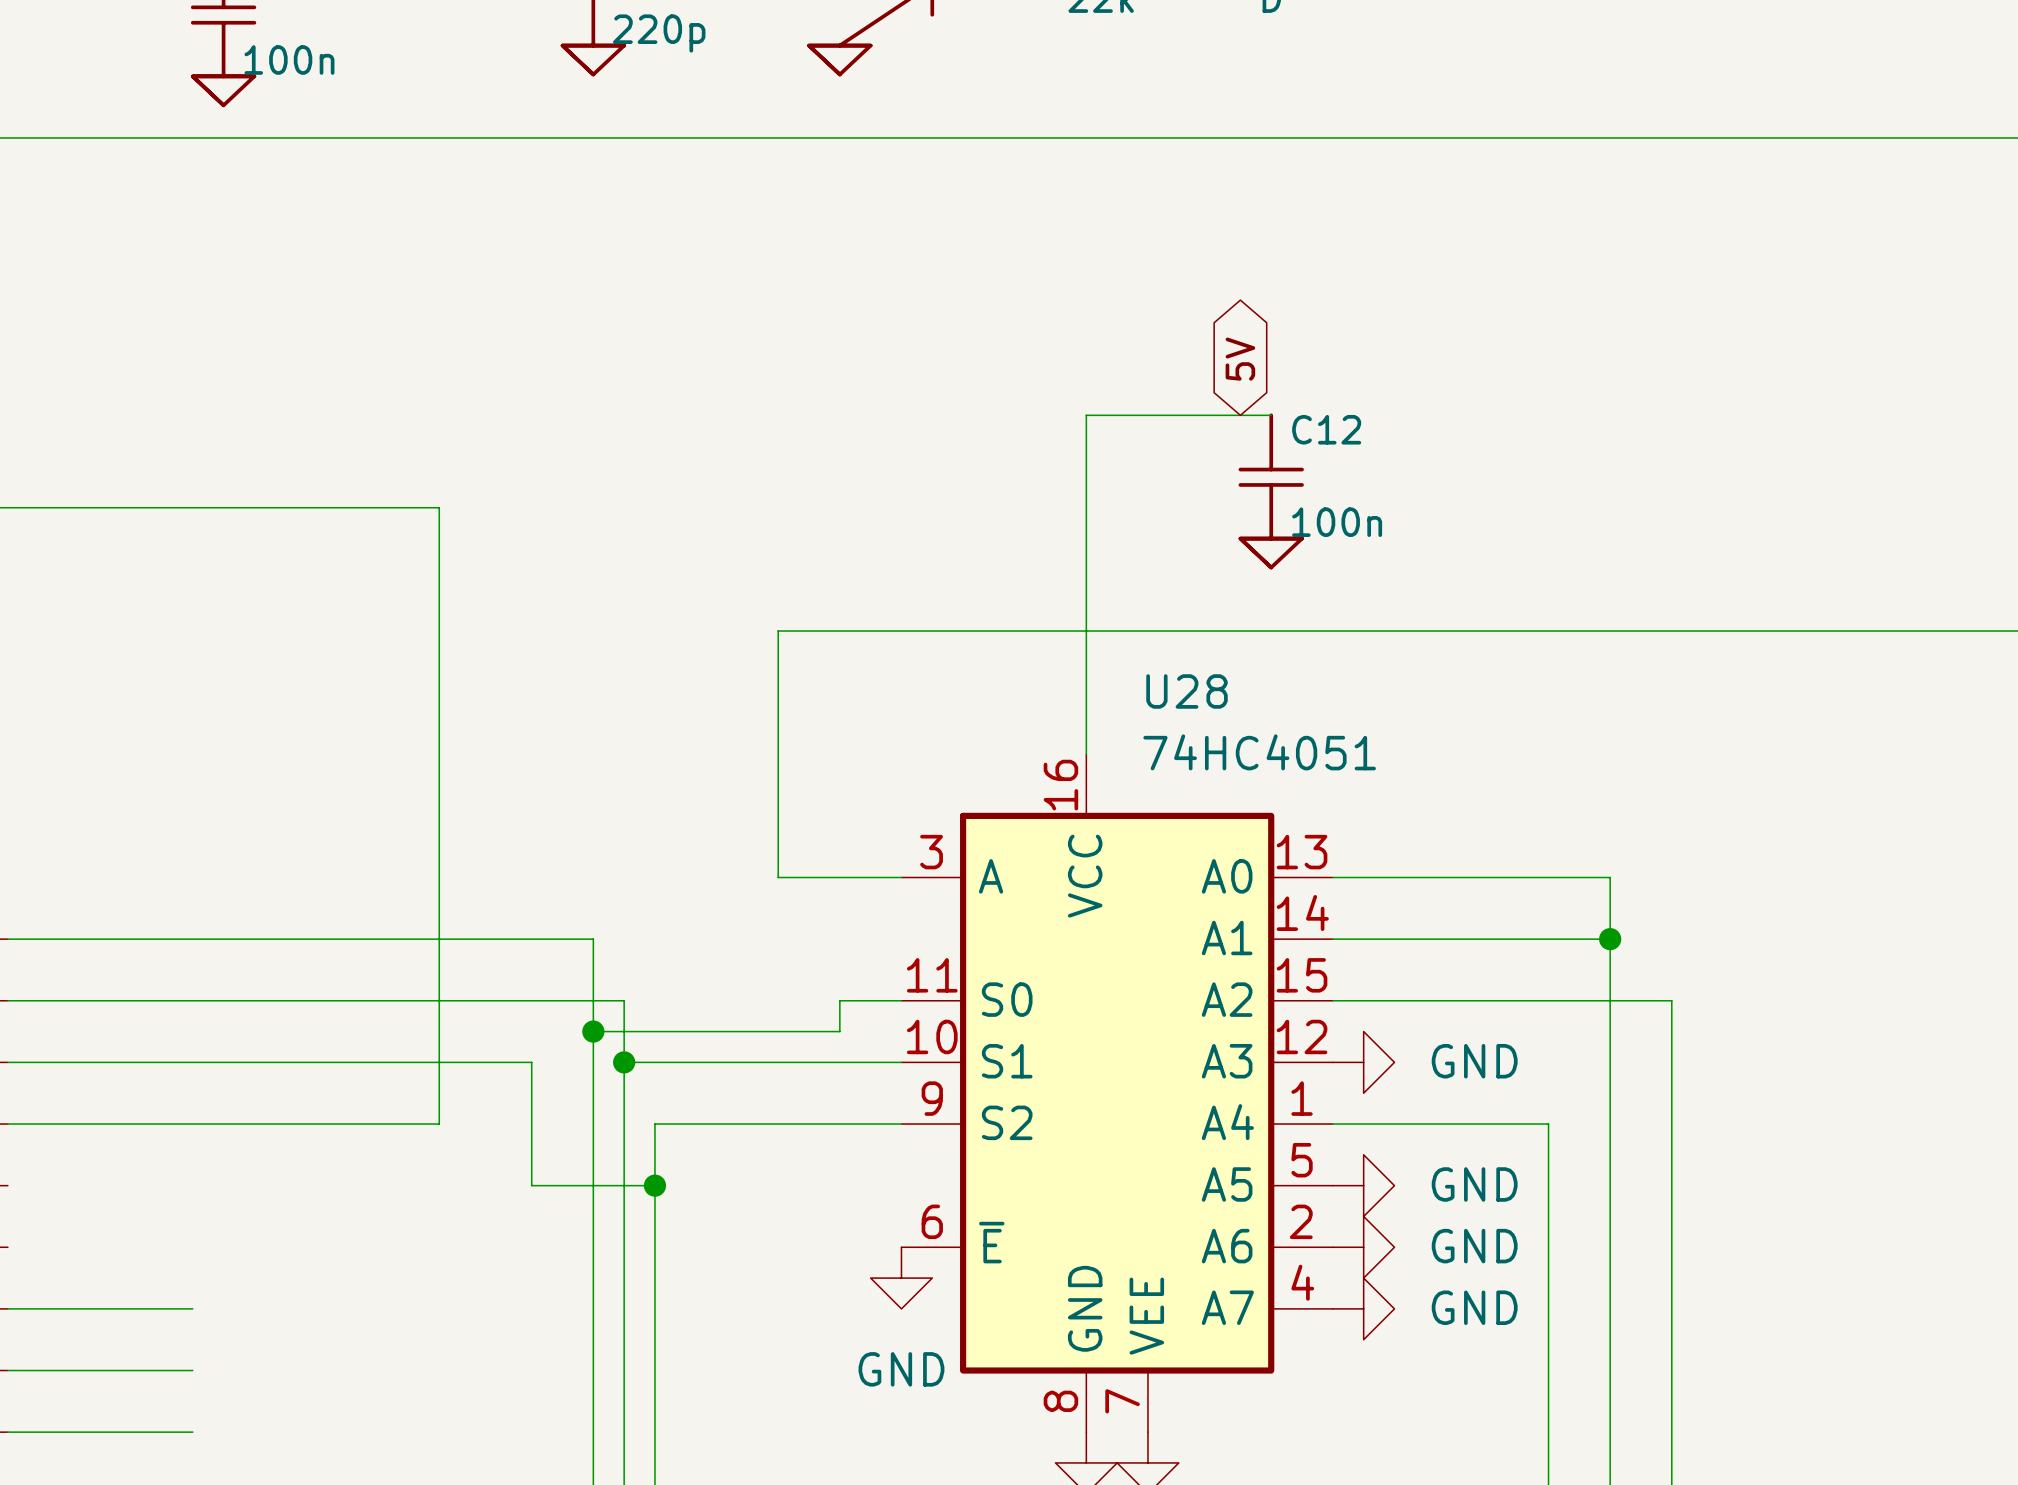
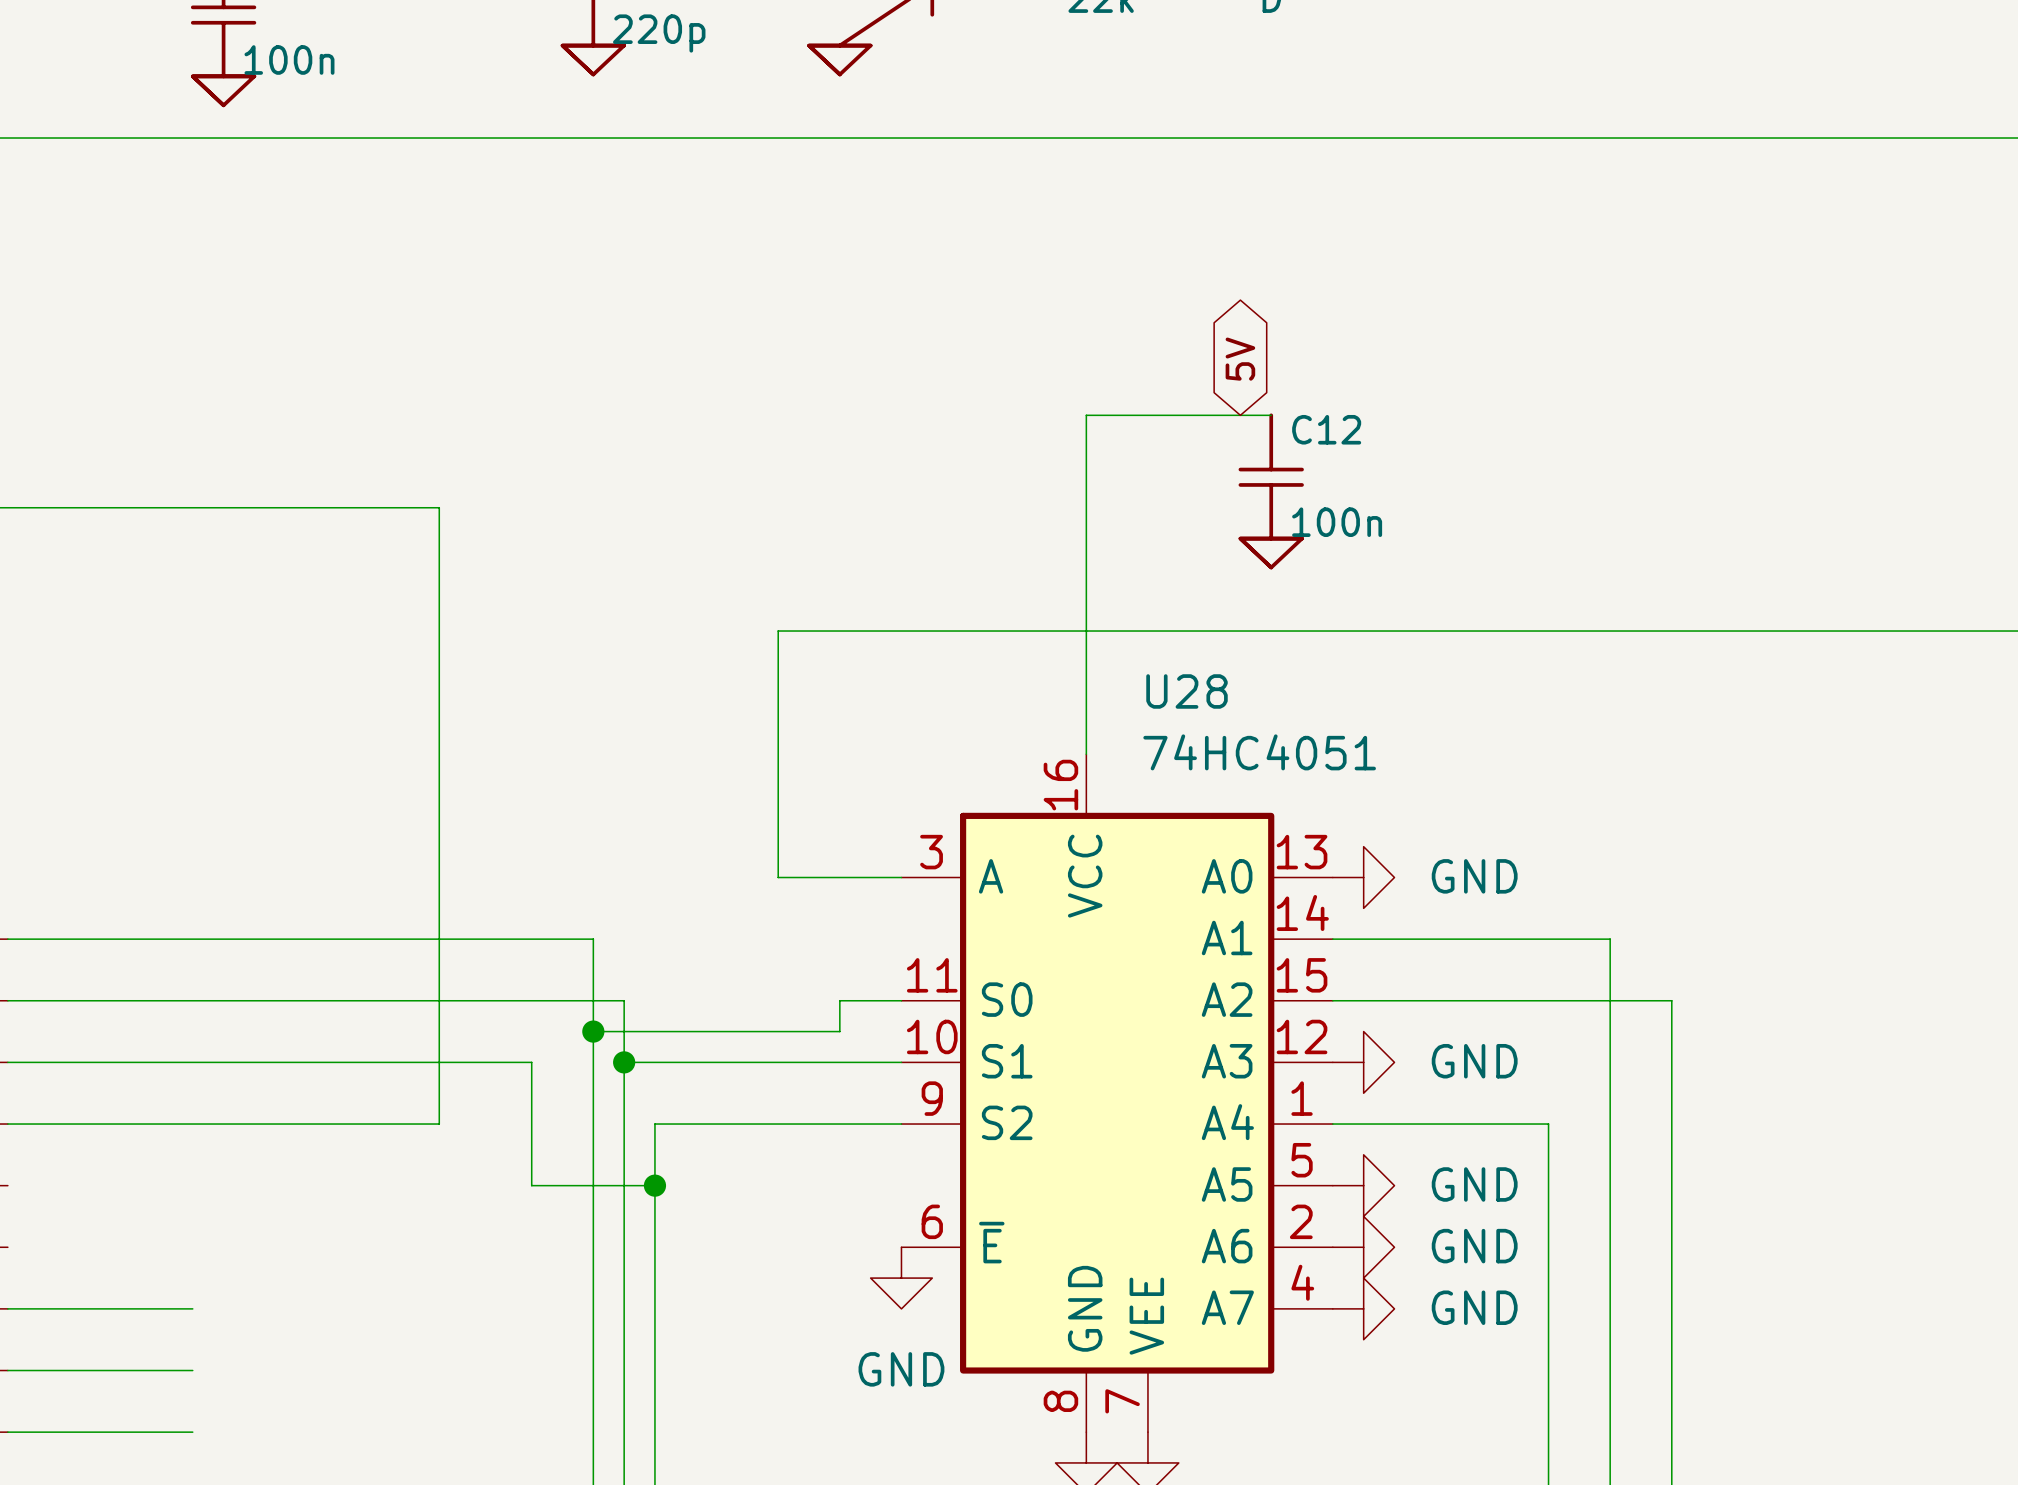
wire: (1332, 877) (1610, 877) (1610, 939) -> none
power symbol: none -> GND (1363, 877)
junction: (1610, 939) -> none

